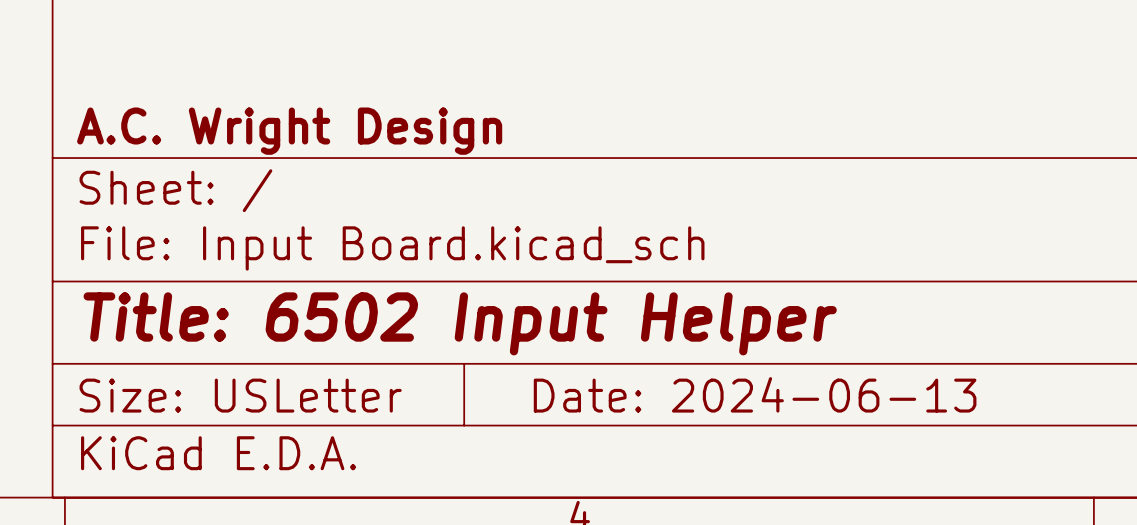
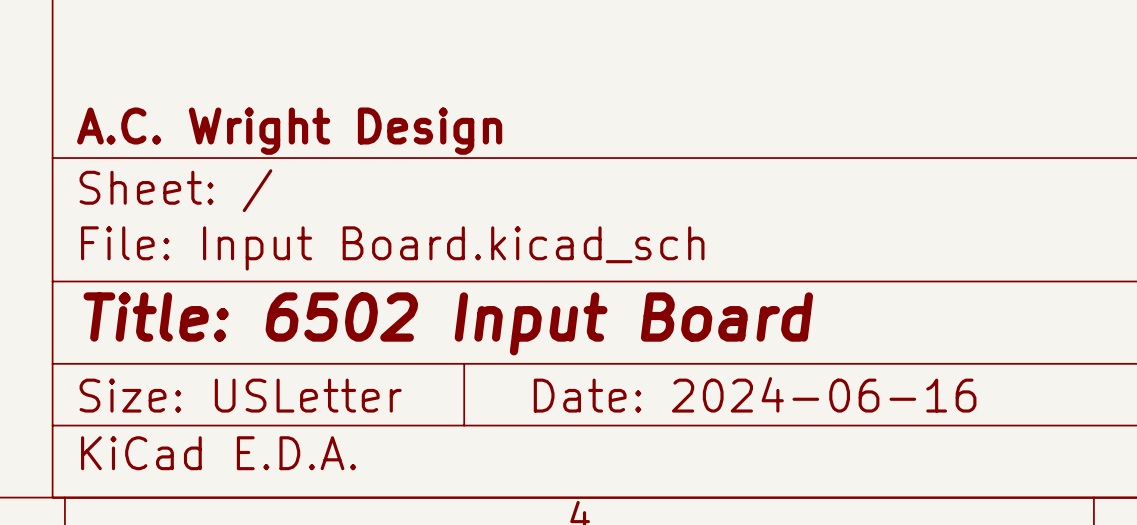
title block: Title: 6502 Input Helper (460, 323) -> Title: 6502 Input Board (448, 323)
title block: Date: 2024-06-13 (755, 394) -> Date: 2024-06-16 (755, 394)

